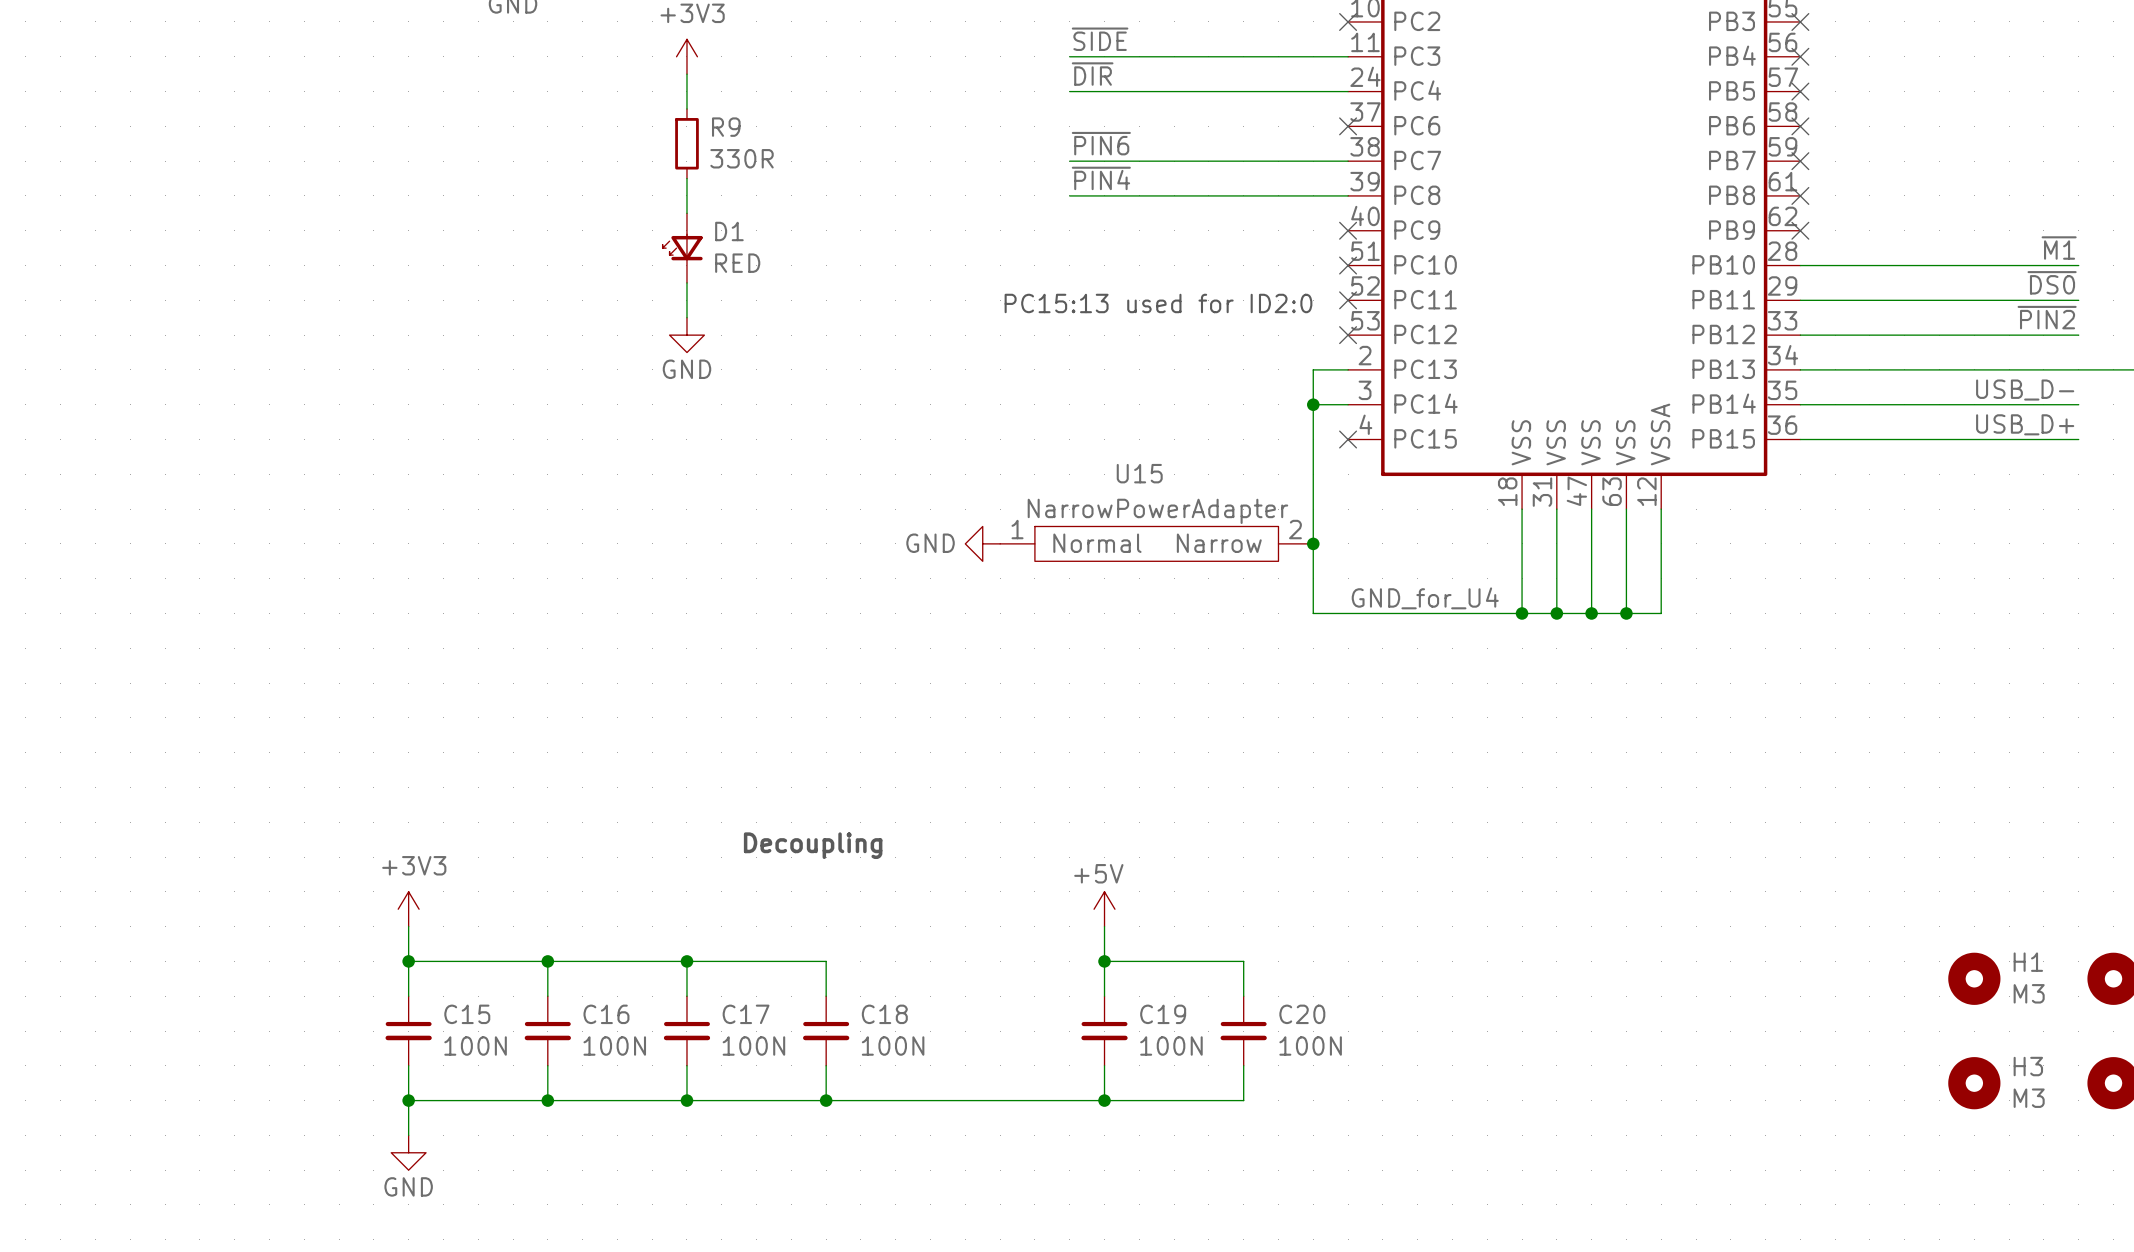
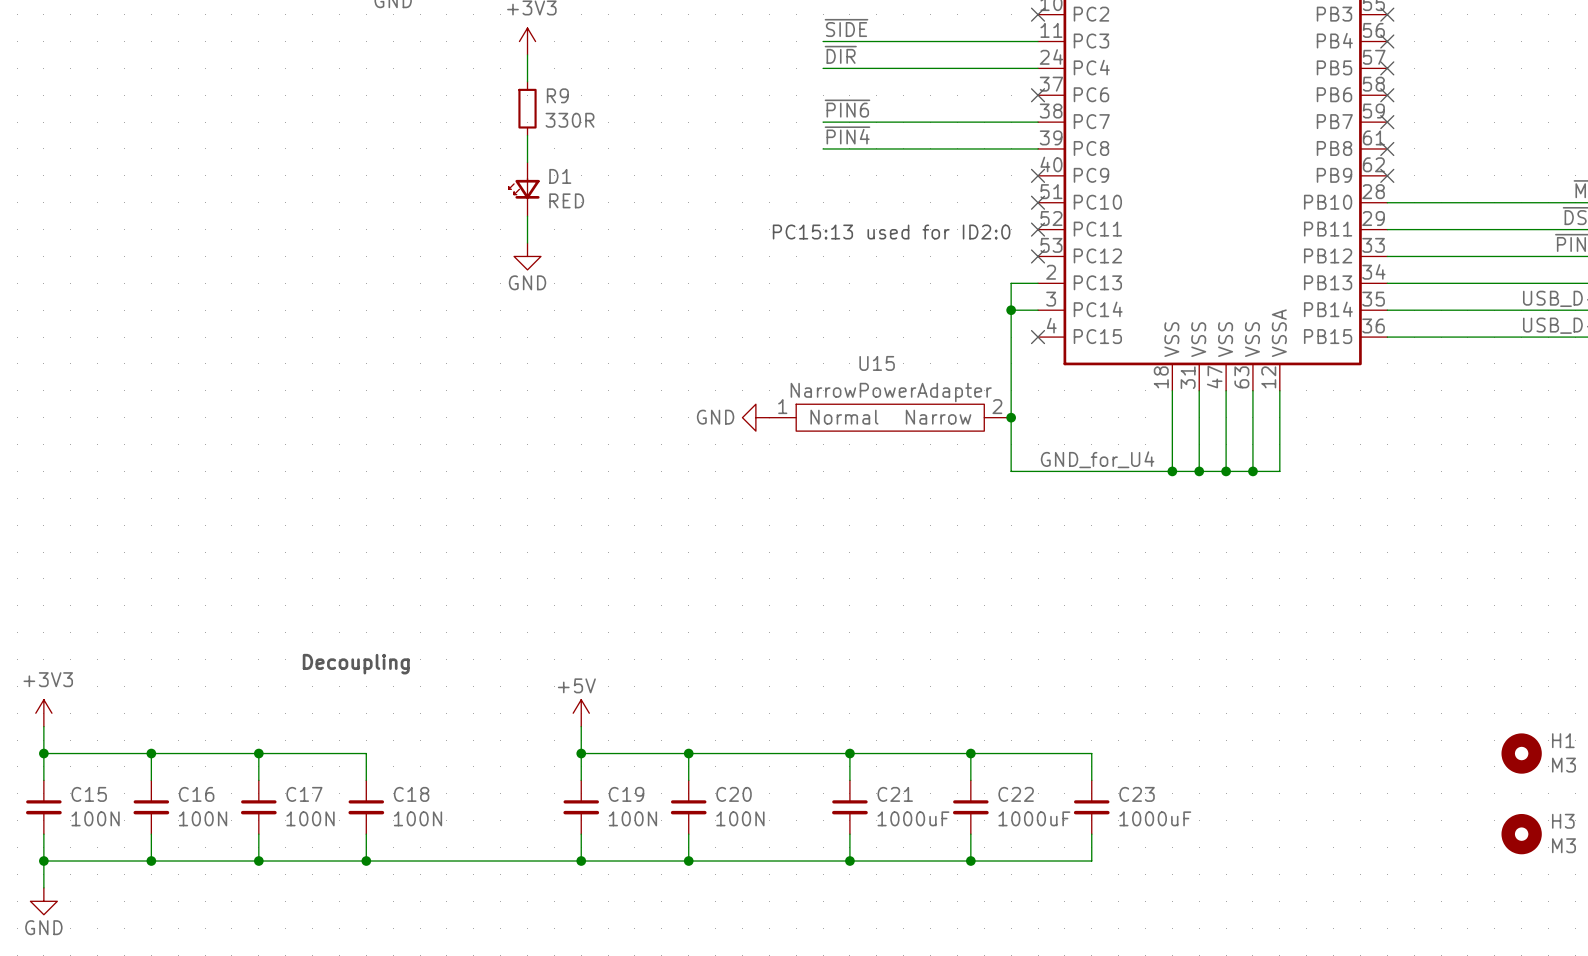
text: Decoupling (813, 845) -> none
text: none -> Decoupling (356, 664)
power symbol: +3V3 (408, 909) -> none
power symbol: +5V (1104, 909) -> none
power symbol: none -> +3V3 (43, 713)
wire: (408, 926) (408, 996) -> none
power symbol: none -> +5V (581, 713)
wire: (1104, 926) (1104, 978) -> none
wire: none -> (43, 726) (43, 780)
wire: none -> (581, 726) (581, 780)
wire: (408, 961) (826, 961) (826, 996) -> none
junction: (408, 961) -> none
wire: (547, 961) (547, 996) -> (258, 753) (258, 780)
junction: (547, 961) -> none
wire: (686, 961) (686, 996) -> (688, 753) (688, 780)
junction: (686, 961) -> none
wire: (1104, 961) (1243, 961) (1243, 996) -> none
junction position: (1104, 961) -> (849, 753)
wire: none -> (43, 753) (366, 753) (366, 780)
junction: none -> (43, 753)
wire: none -> (151, 753) (151, 780)
junction: none -> (151, 753)
junction: none -> (258, 753)
wire: none -> (581, 753) (1091, 753) (1091, 780)
junction: none -> (581, 753)
junction: none -> (688, 753)
wire: none -> (970, 753) (970, 780)
junction: none -> (970, 753)
C15 position: (408, 1031) -> (43, 807)
C16 position: (547, 1031) -> (151, 807)
C17 position: (686, 1031) -> (258, 807)
C18 position: (826, 1031) -> (366, 807)
C19 position: (1104, 1031) -> (581, 807)
C20 position: (1243, 1031) -> (688, 807)
C21: none -> 1000uF (849, 807)
C22: none -> 1000uF (970, 807)
C23: none -> 1000uF (1091, 807)
wire: (408, 1065) (408, 1135) -> none
wire: (547, 1065) (547, 1100) -> (581, 834) (581, 861)
wire: (686, 1065) (686, 1100) -> (688, 834) (688, 861)
wire: (826, 1065) (826, 1100) -> none
wire: (1243, 1065) (1243, 1100) (408, 1100) -> none
wire: none -> (43, 834) (43, 887)
wire: none -> (151, 834) (151, 861)
wire: none -> (258, 834) (258, 861)
wire: none -> (366, 834) (366, 861)
wire: none -> (970, 834) (970, 861)
wire: none -> (1091, 834) (1091, 861) (43, 861)
junction: (408, 1100) -> none
junction: (547, 1100) -> none
junction: (686, 1100) -> none
junction: (826, 1100) -> none
junction position: (1104, 1100) -> (849, 861)
junction: none -> (43, 861)
junction: none -> (151, 861)
junction: none -> (258, 861)
junction: none -> (366, 861)
junction: none -> (581, 861)
junction: none -> (688, 861)
junction: none -> (970, 861)
power symbol: GND (408, 1152) -> none
power symbol: none -> GND (43, 901)

